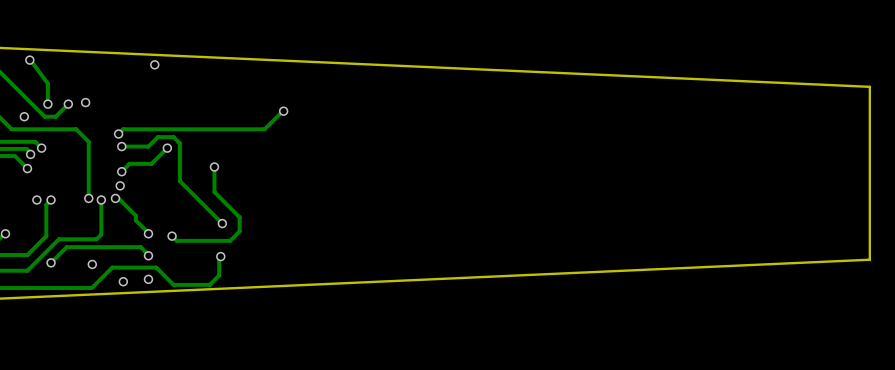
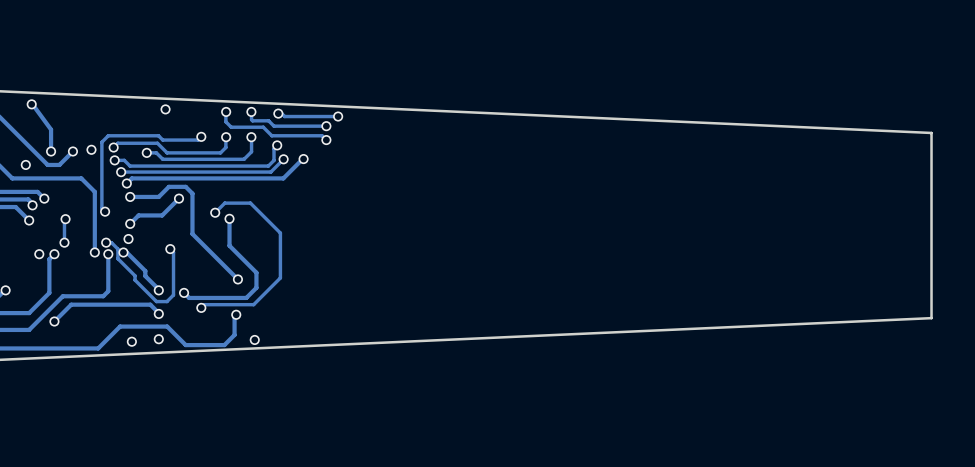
track: none -> (226, 111) (225, 121) (231, 127) (263, 127) (271, 135) (322, 135) (326, 140)
via: none -> (226, 111)
via: none -> (251, 111)
track: none -> (251, 112) (252, 120) (268, 120) (274, 126) (326, 126)
track: none -> (278, 113) (284, 116) (338, 116)
via: none -> (278, 113)
via: none -> (338, 116)
via: none -> (326, 126)
track: none -> (201, 136) (198, 140) (162, 140) (158, 135) (108, 135) (101, 142) (101, 208) (105, 211)
via: none -> (201, 136)
track: none -> (226, 137) (225, 147) (220, 152) (167, 152) (157, 143) (117, 143) (113, 147)
via: none -> (226, 137)
via: none -> (251, 137)
track: none -> (251, 137) (251, 151) (244, 159) (162, 159) (156, 152) (146, 152)
via: none -> (326, 140)
track: none -> (277, 145) (274, 148) (274, 160) (268, 166) (130, 166) (124, 160) (114, 160)
via: none -> (277, 145)
via: none -> (113, 147)
via: none -> (146, 152)
track: none -> (283, 159) (270, 172) (121, 172)
via: none -> (283, 159)
via: none -> (114, 160)
via: none -> (121, 172)
via: none -> (105, 211)
track: none -> (215, 212) (224, 203) (250, 203) (280, 233) (280, 277) (253, 304) (204, 304) (201, 307)
via: none -> (215, 212)
track: none -> (65, 219) (64, 242)
via: none -> (65, 219)
via: none -> (64, 242)
track: none -> (106, 242) (111, 242) (117, 249) (117, 258) (135, 275) (135, 280) (156, 301) (166, 301) (173, 295) (173, 252) (170, 249)
via: none -> (106, 242)
via: none -> (170, 249)
via: none -> (201, 307)
via: (92, 264) -> none
via: none -> (254, 339)

